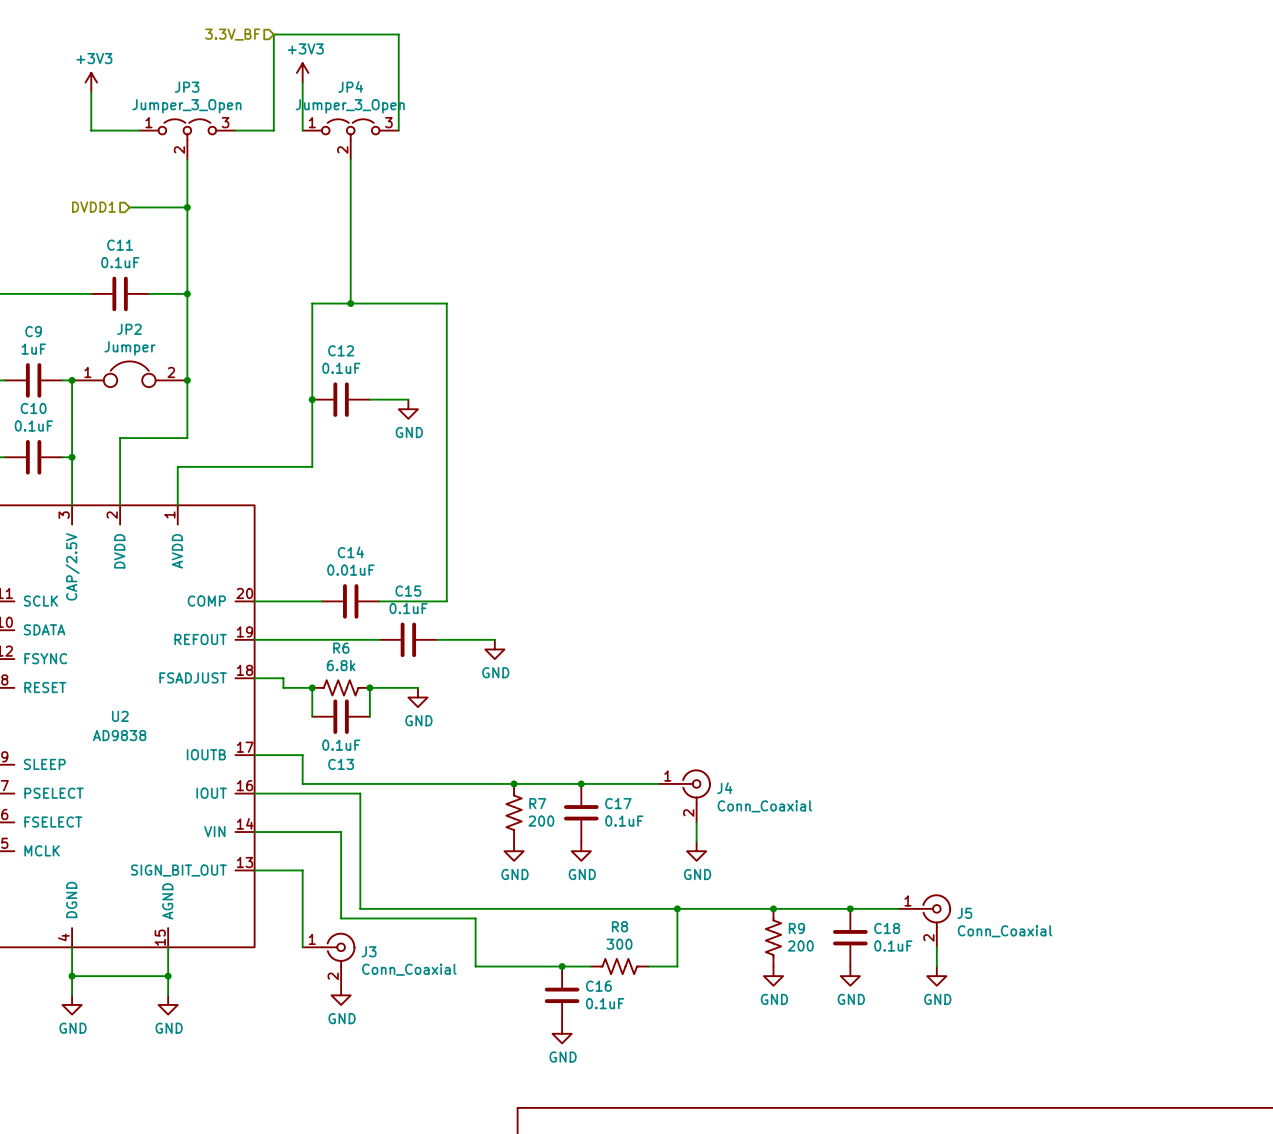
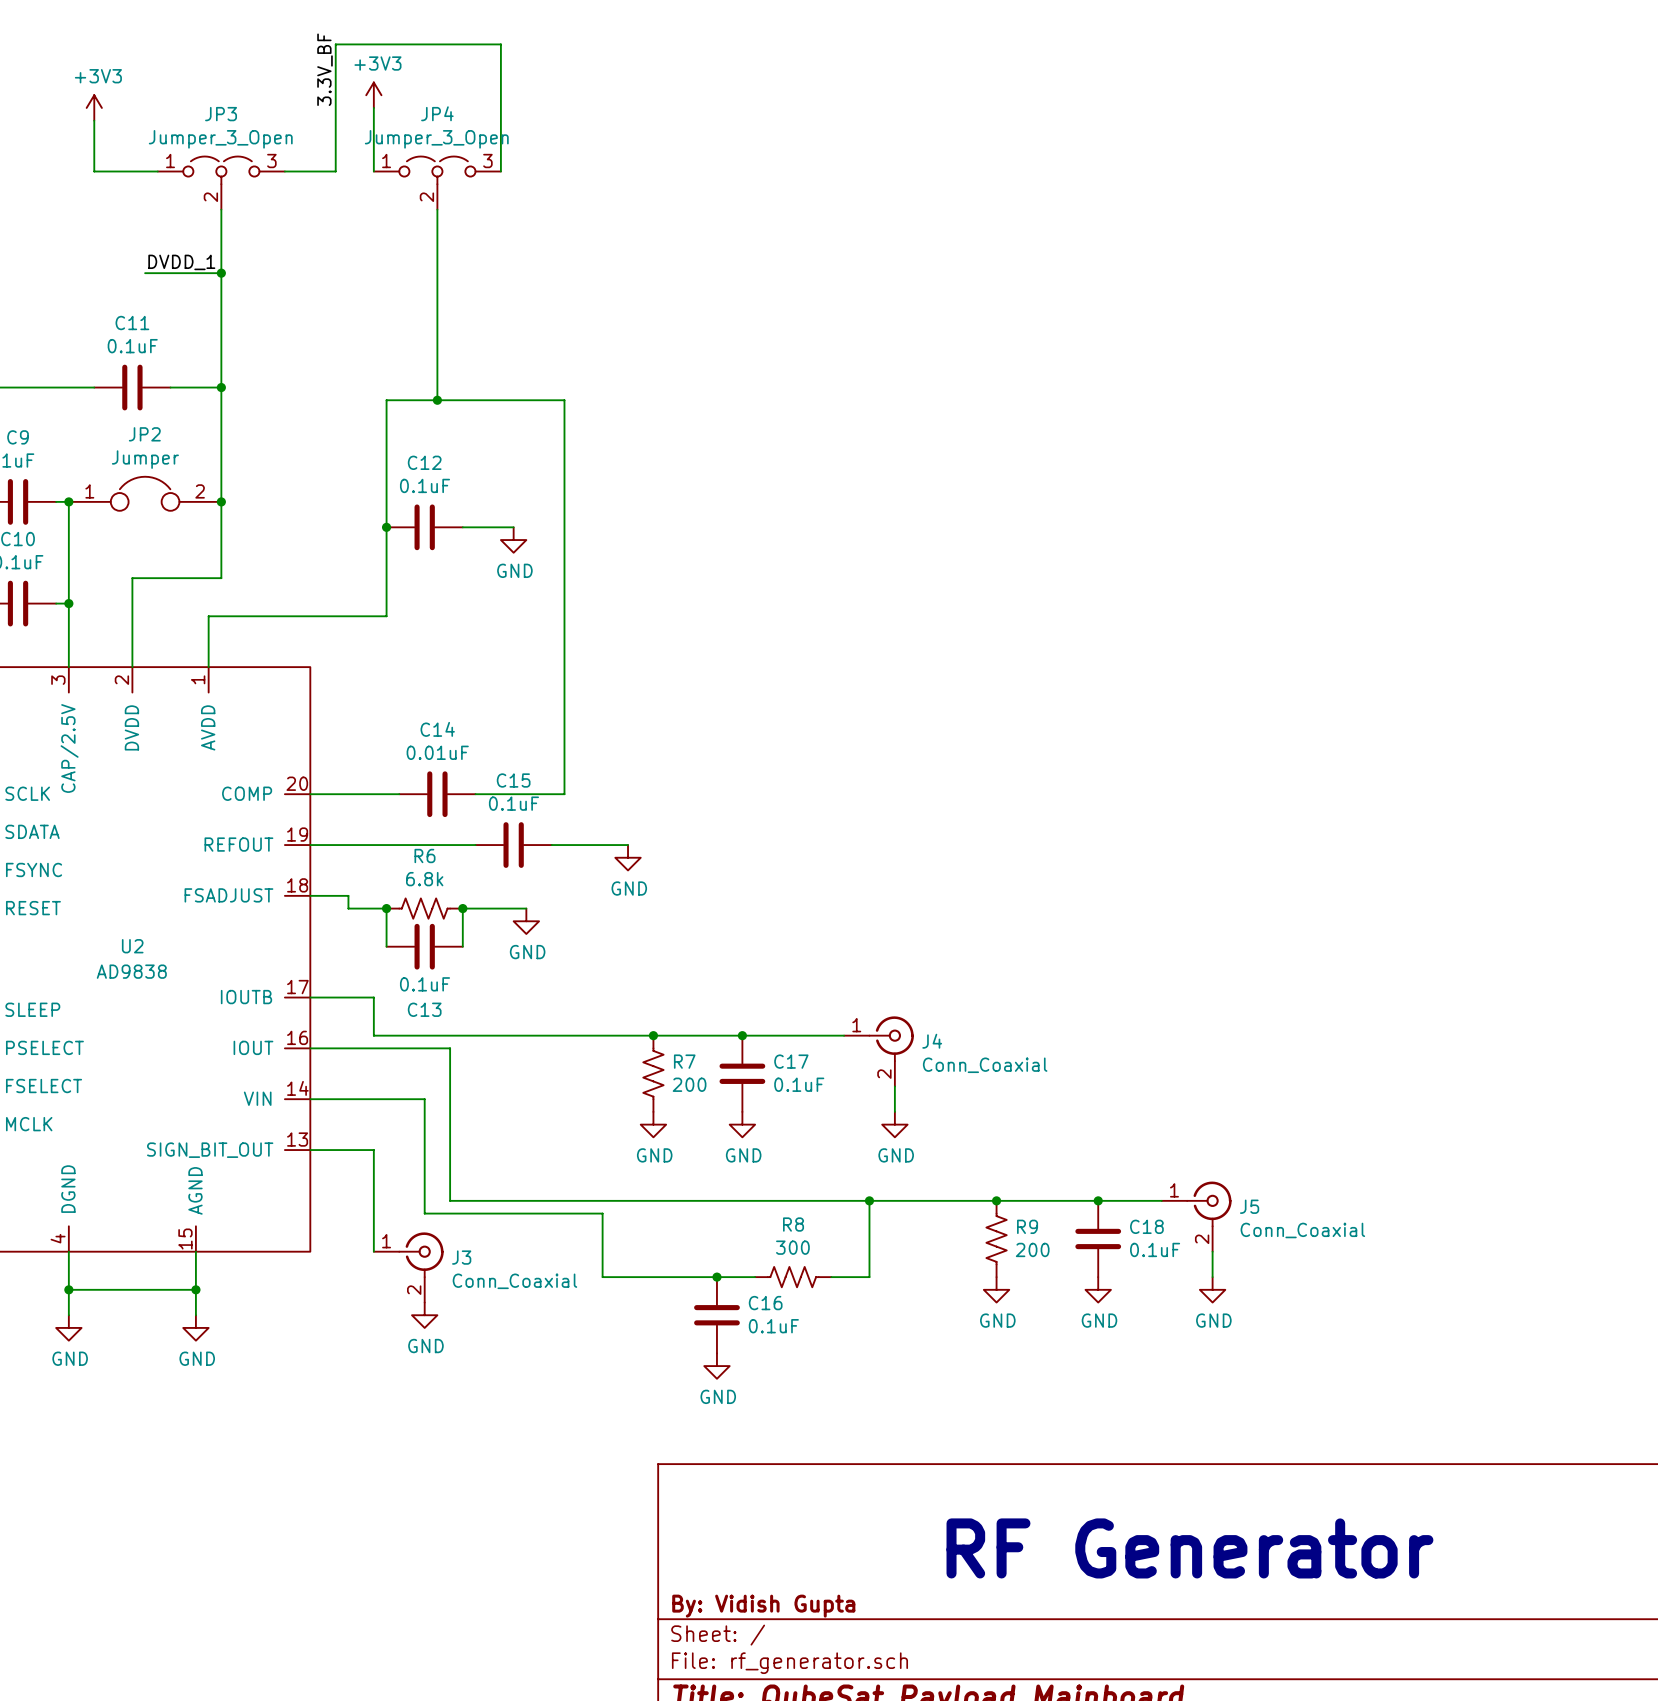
hierarchical label: 3.3V_BF (232, 34) -> none
label: none -> 3.3V_BF (324, 69)
label: none -> DVDD_1 (181, 262)
hierarchical label: DVDD1 (93, 207) -> none

